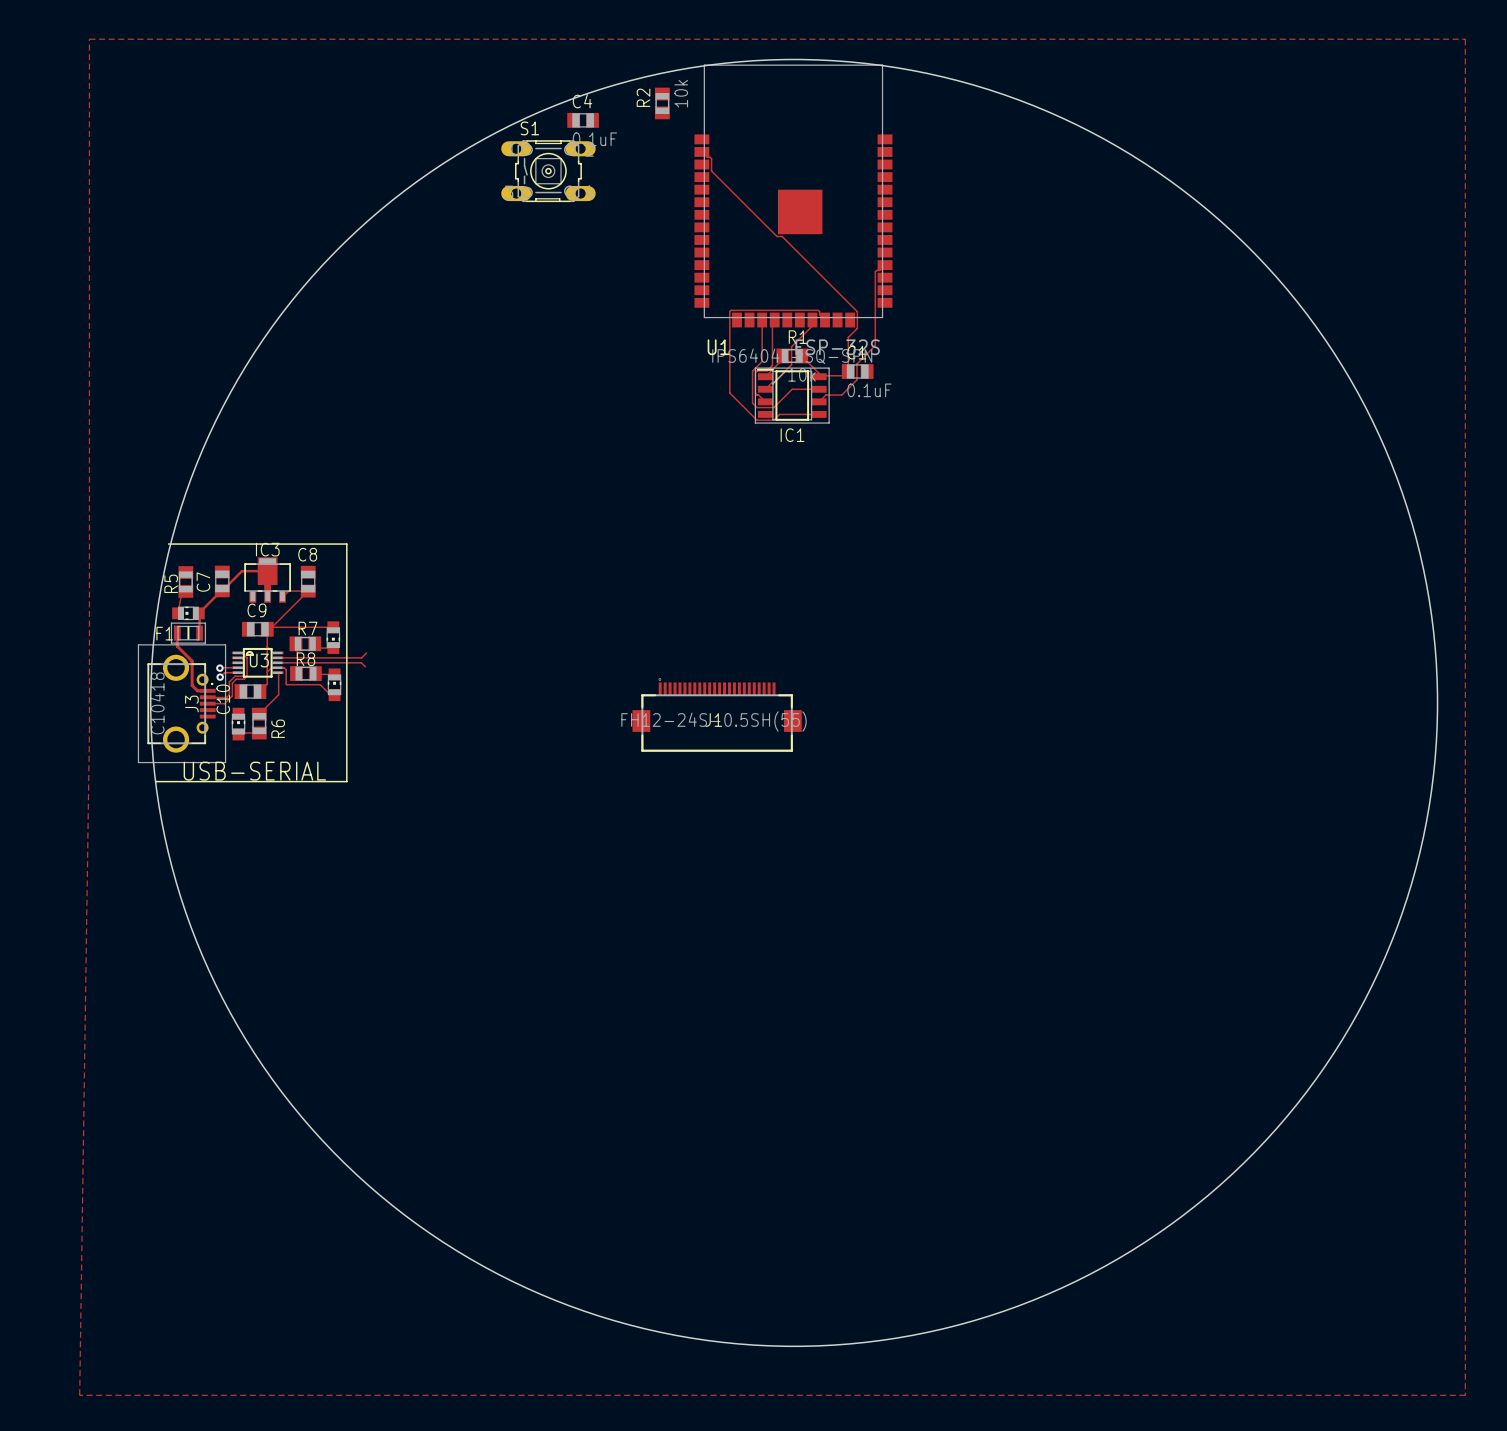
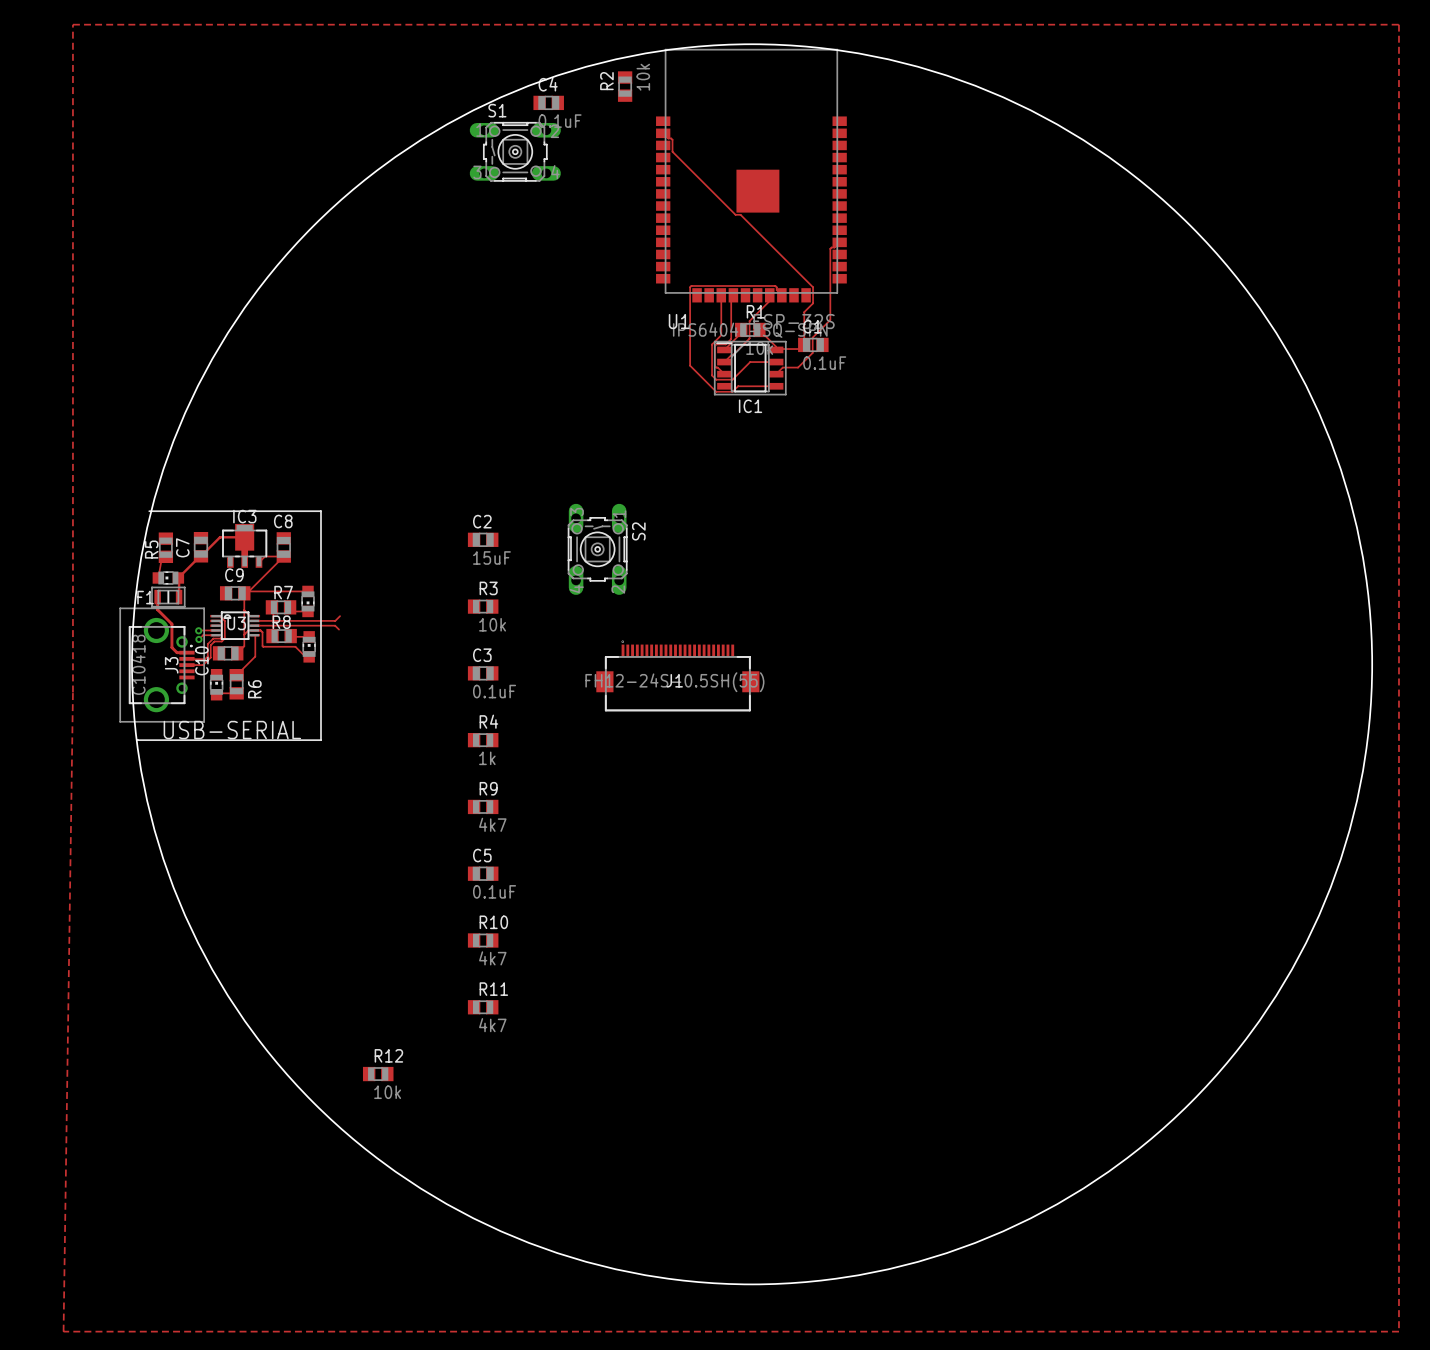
C2: none -> 15uF (483, 539)
S2: none -> (597, 549)
R3: none -> 10k (483, 606)
C3: none -> 0.1uF (483, 673)
R4: none -> 1k (483, 740)
R9: none -> 4k7 (483, 806)
C5: none -> 0.1uF (483, 873)
R10: none -> 4k7 (483, 940)
R11: none -> 4k7 (483, 1007)
R12: none -> 10k (378, 1074)

